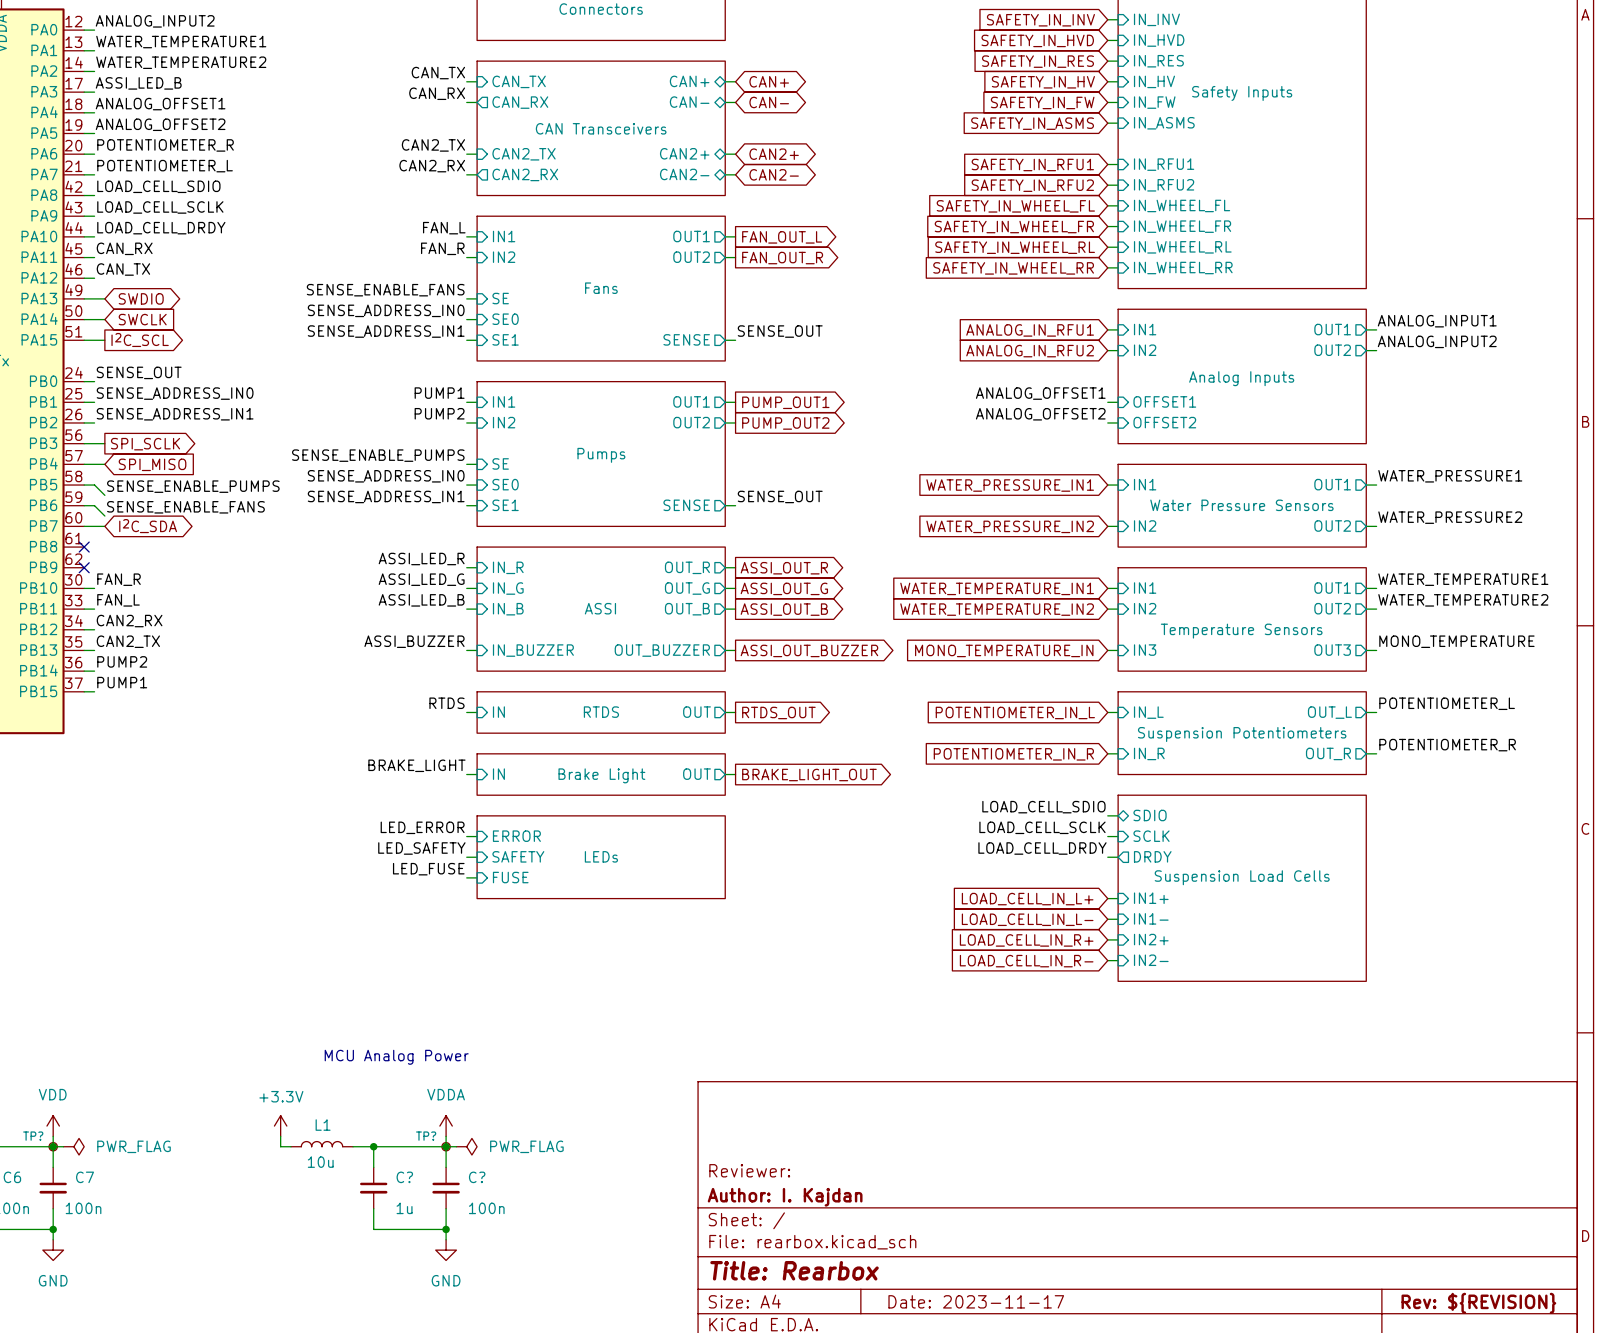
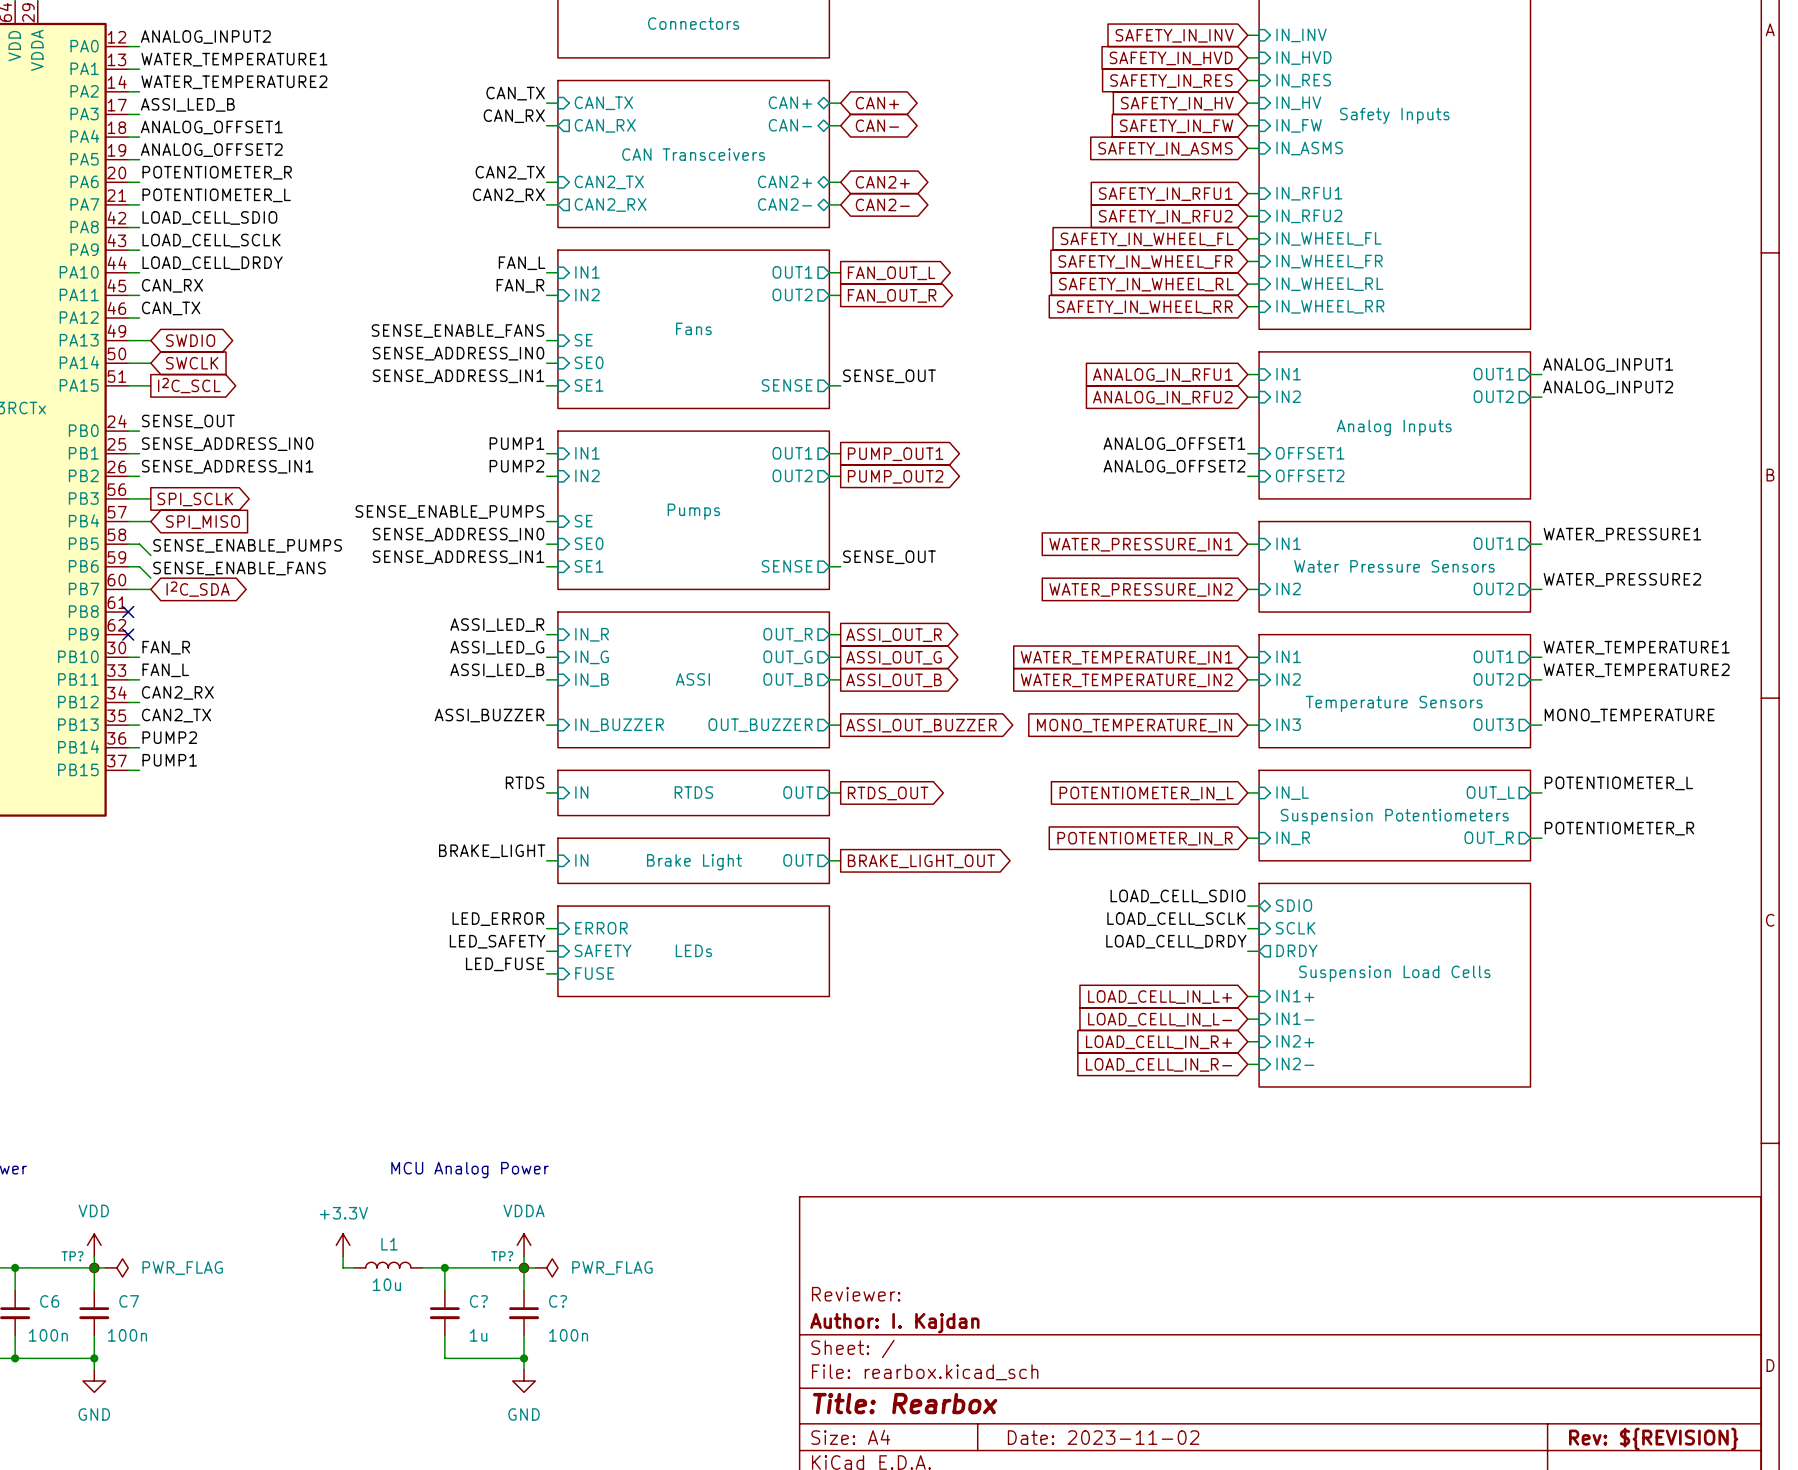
title block: Date: 2023-11-17 (976, 1301) -> Date: 2023-11-02 (1103, 1437)

